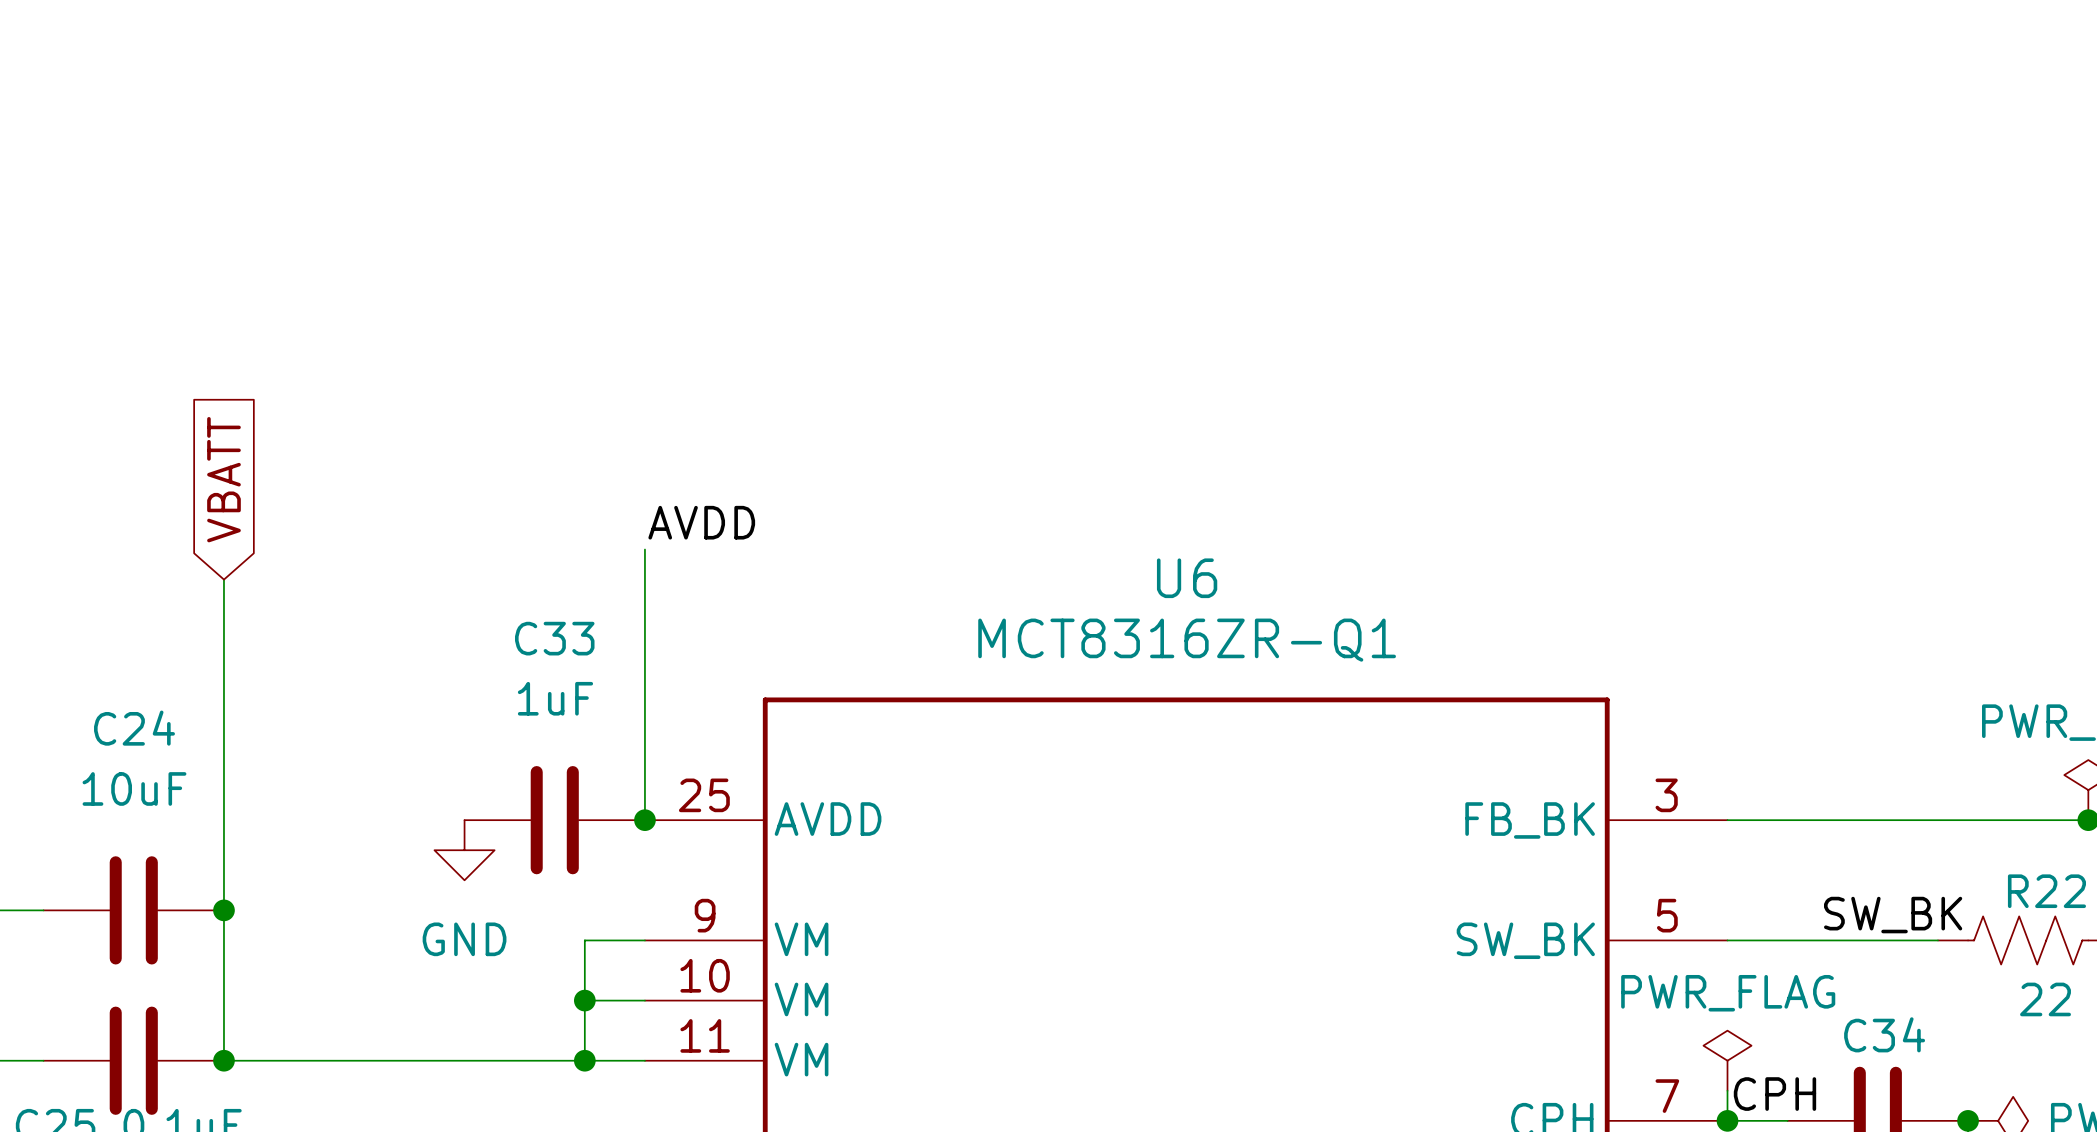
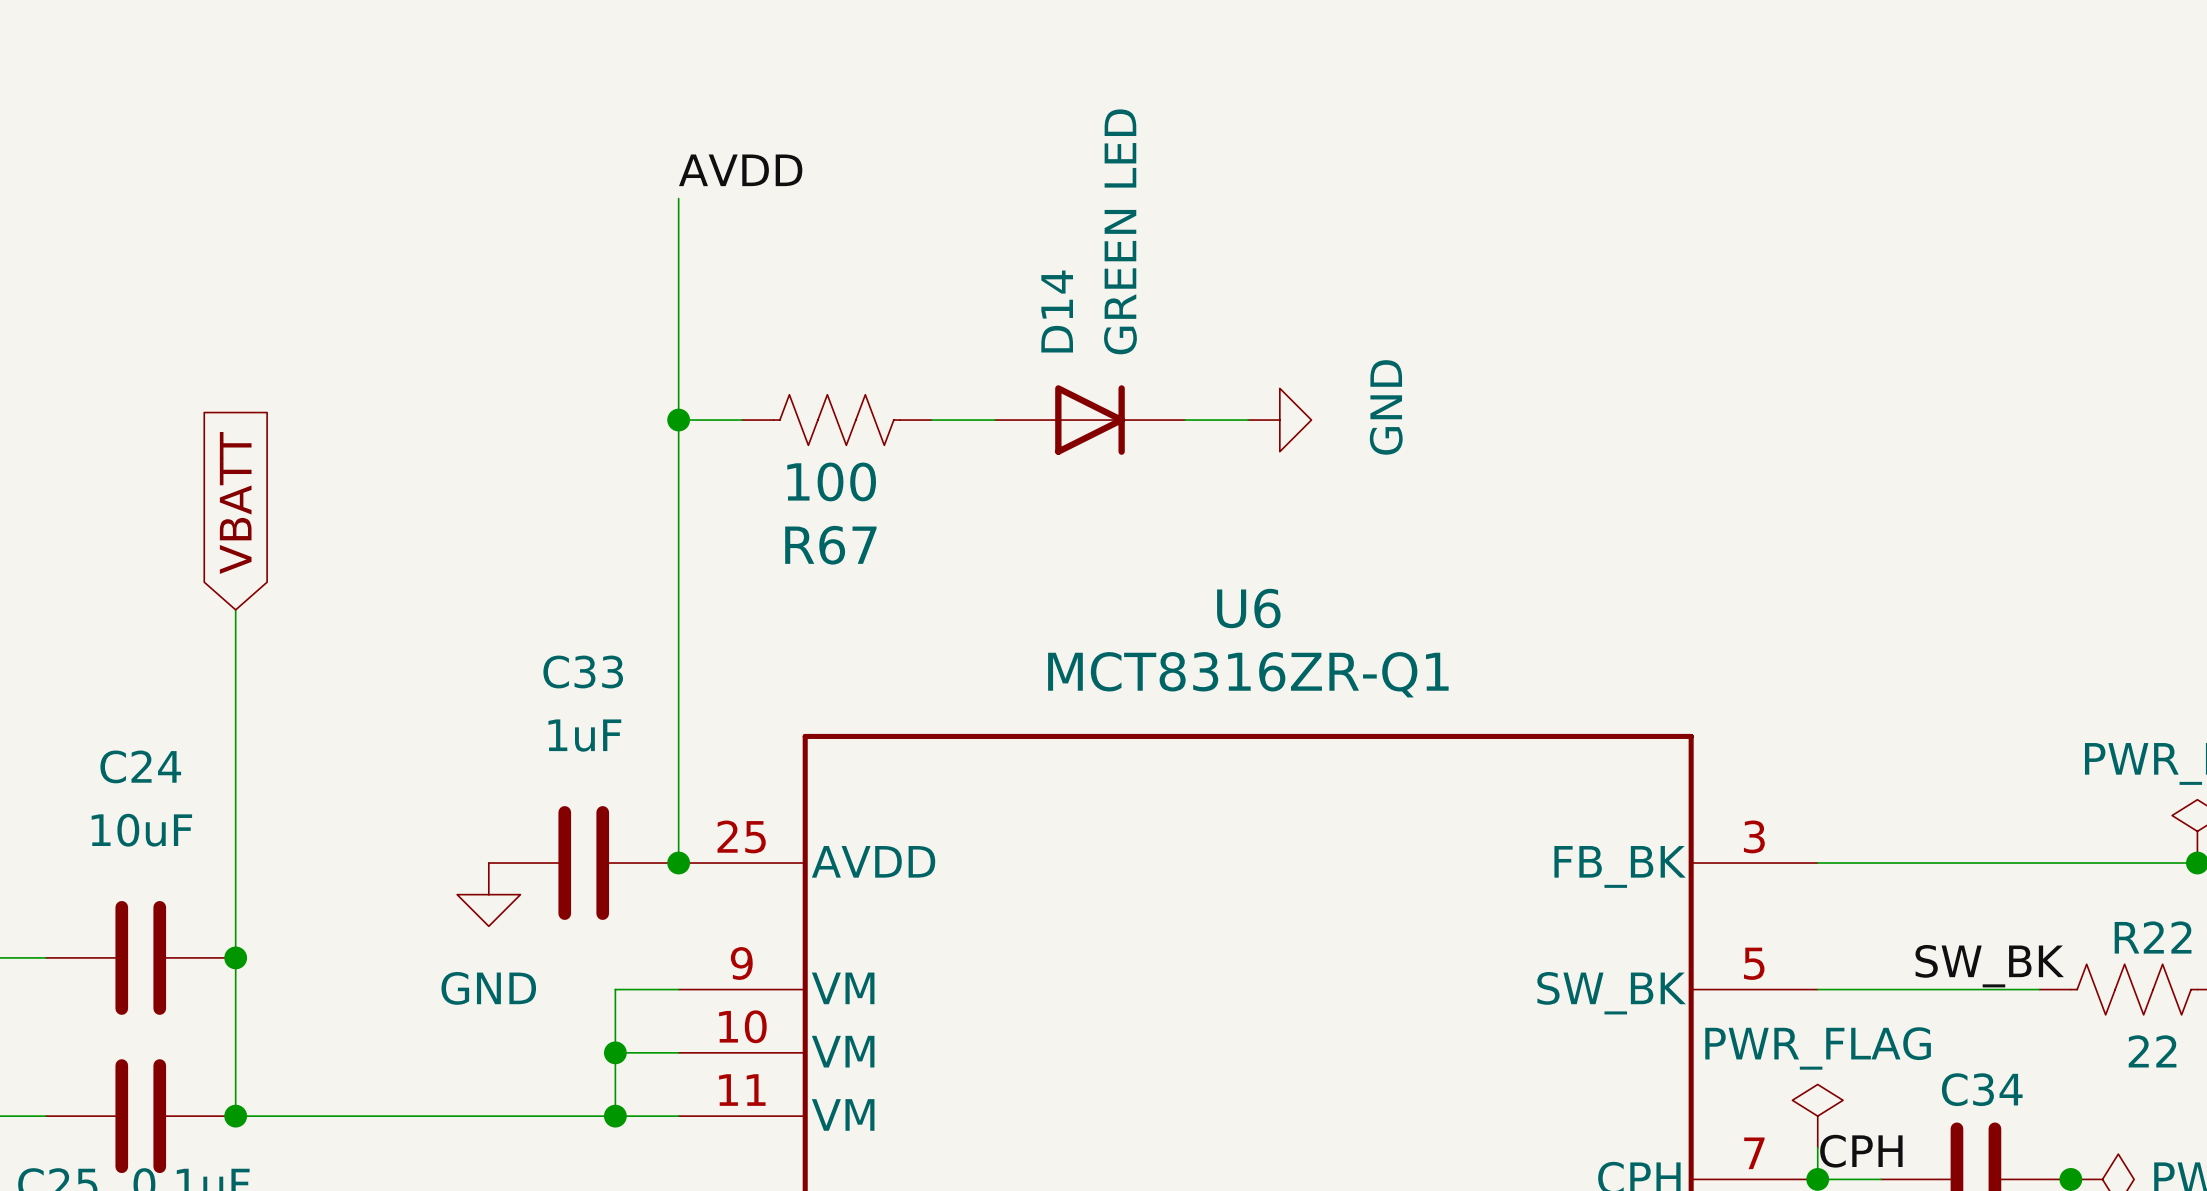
wire: none -> (678, 198) (678, 578)
wire: none -> (678, 420) (741, 420)
junction: none -> (678, 420)
R67: none -> 100 (836, 420)
wire: none -> (931, 420) (995, 420)
D14: none -> GREEN LED (1089, 420)
wire: none -> (1184, 420) (1248, 420)
power symbol: none -> GND (1279, 420)
label position: AVDD (701, 522) -> AVDD (740, 170)

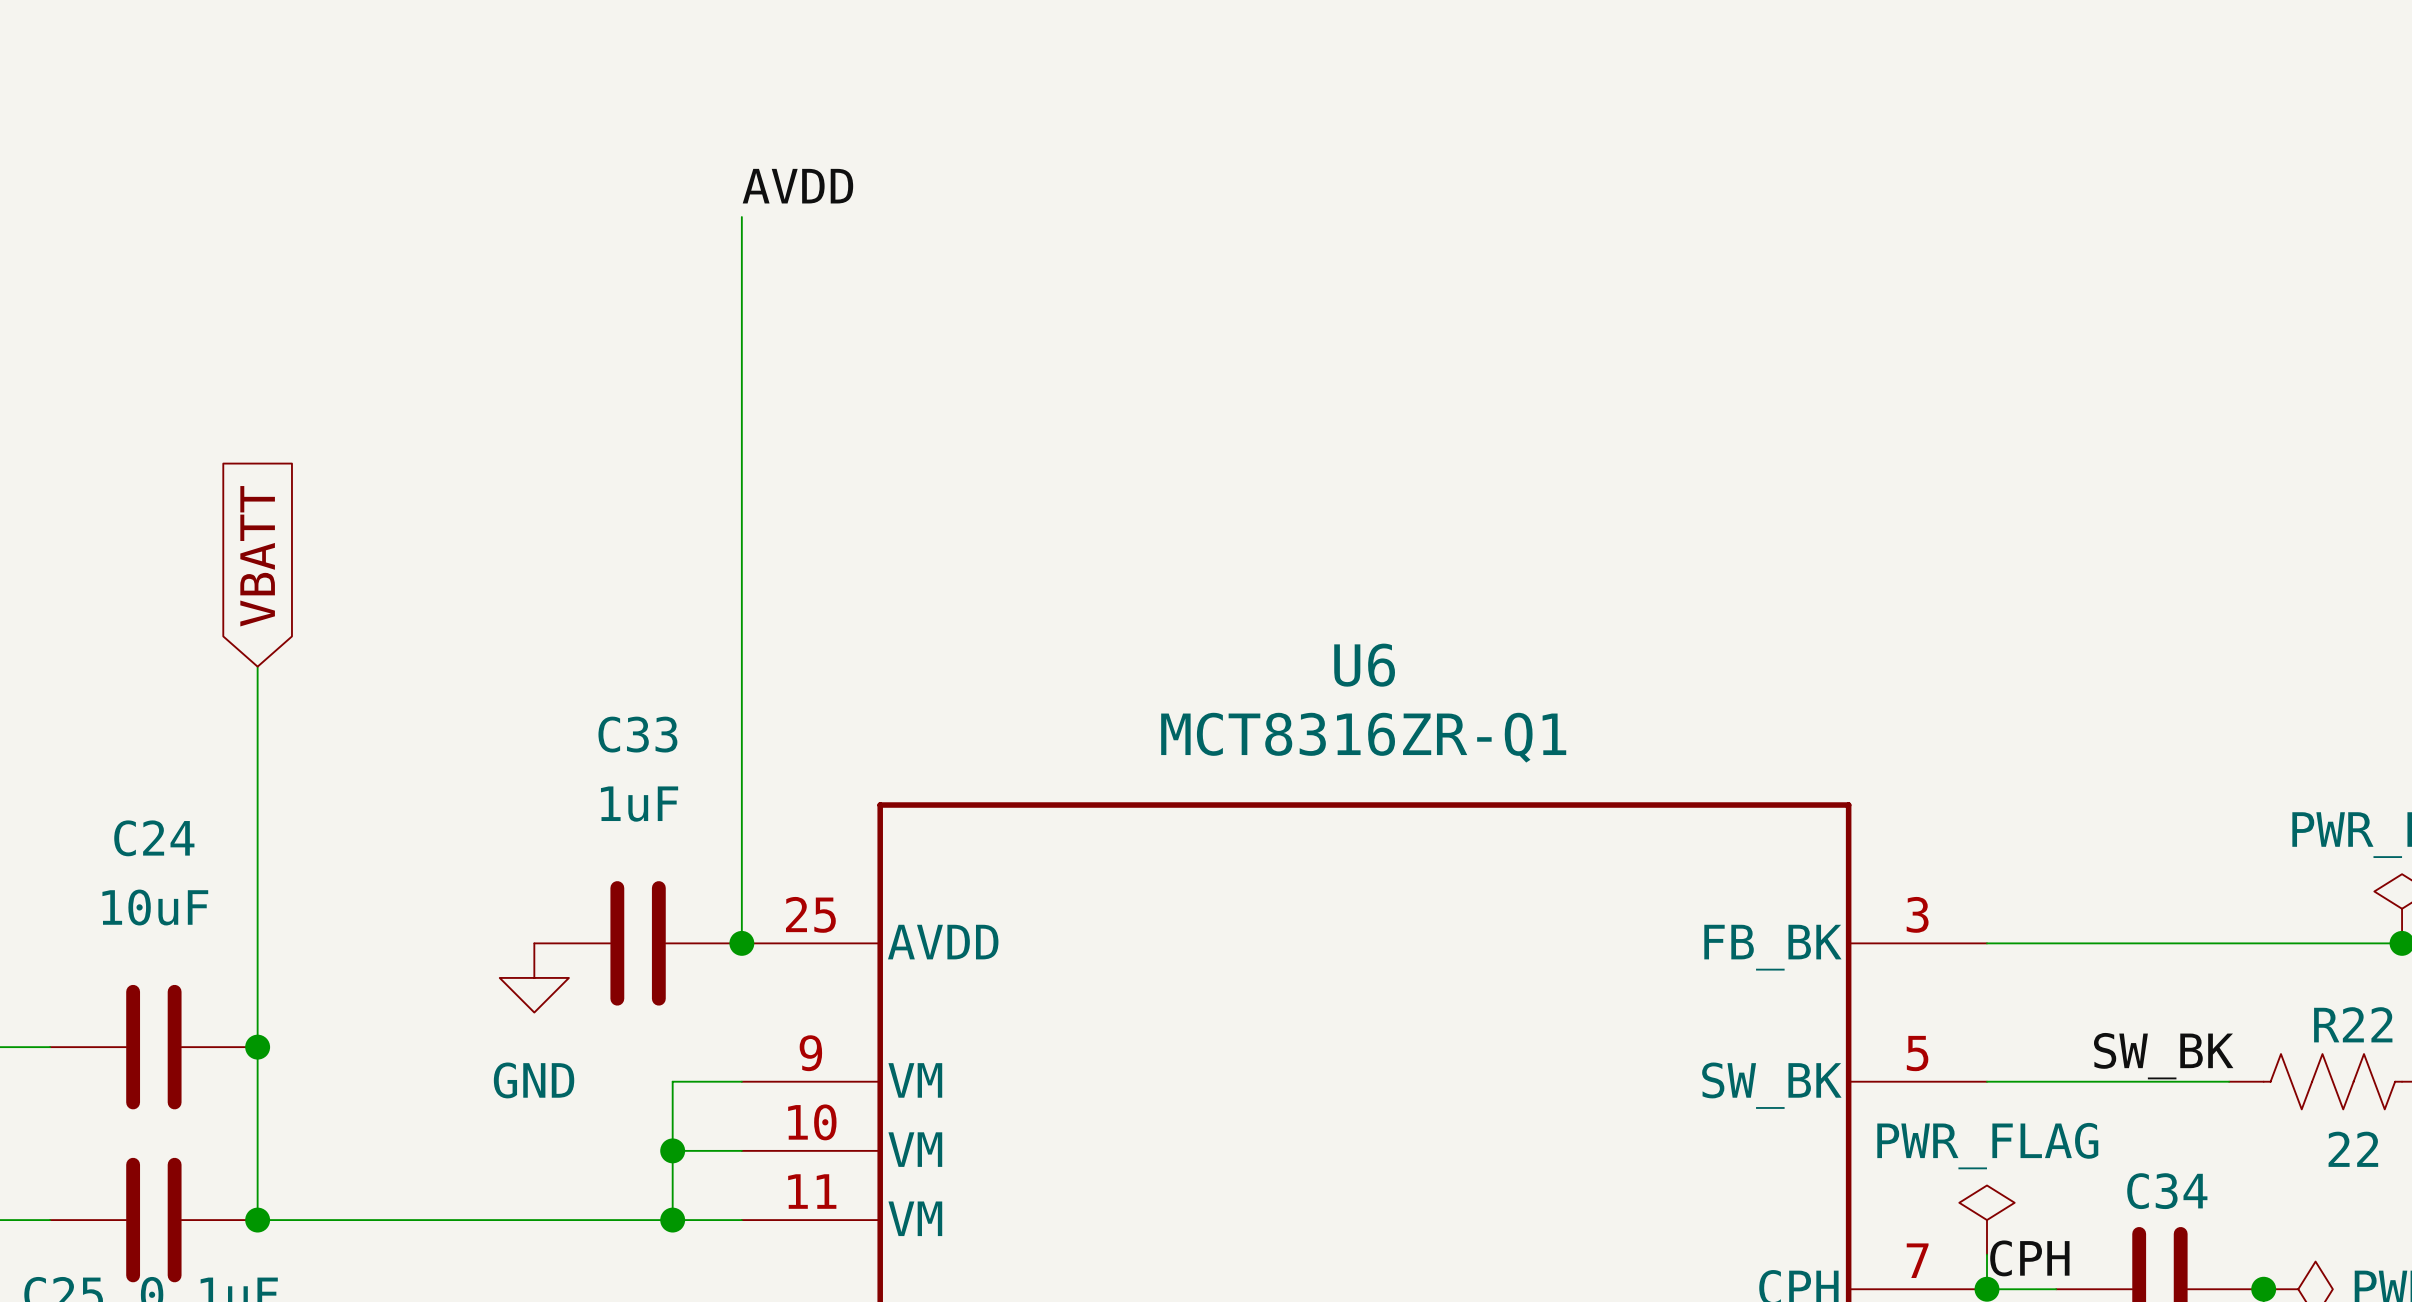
wire: (678, 420) (741, 420) -> none
junction: (678, 420) -> none
R67: 100 (836, 420) -> none
wire: (931, 420) (995, 420) -> none
D14: GREEN LED (1089, 420) -> none
wire: (1184, 420) (1248, 420) -> none
power symbol: GND (1279, 420) -> none

